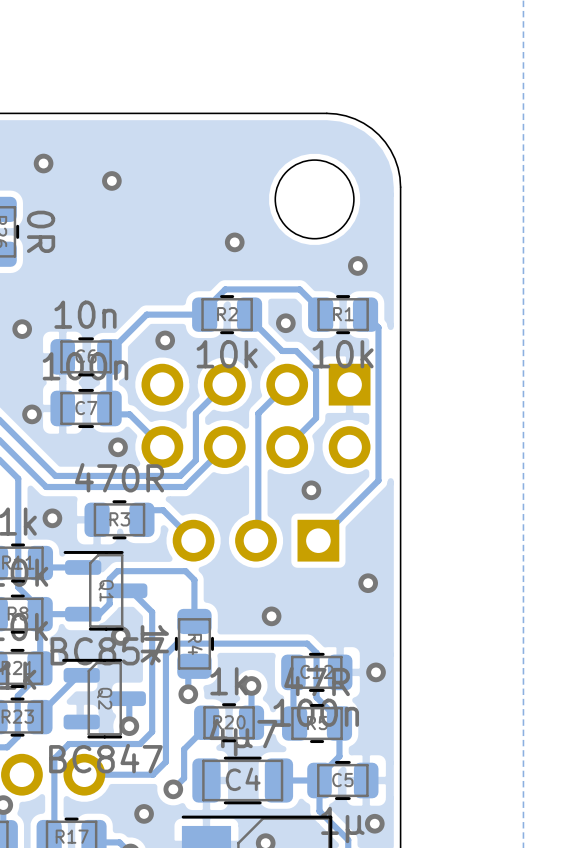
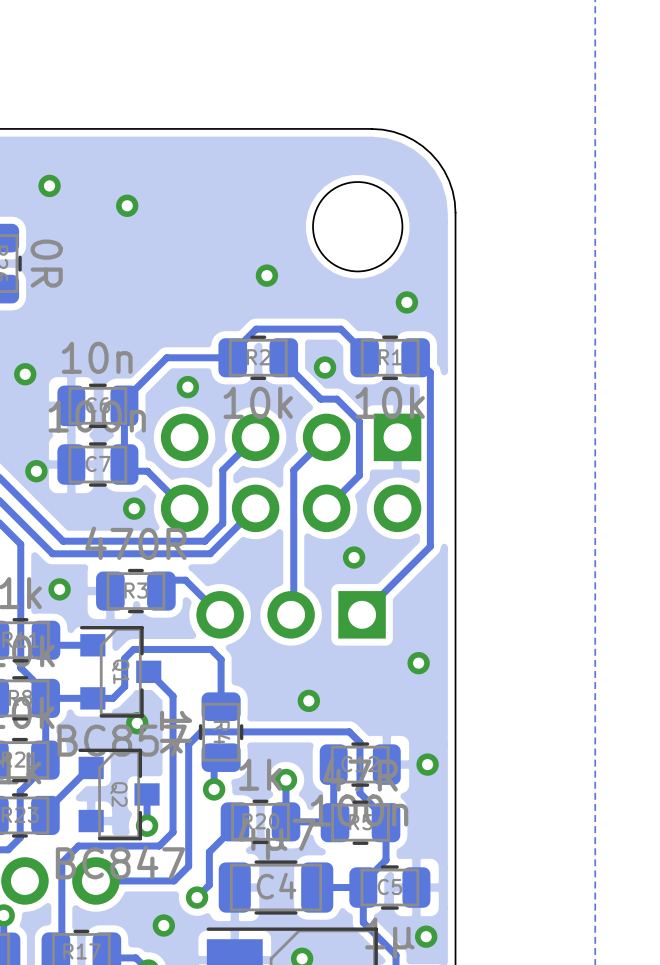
Q1 footprint: [63, 551, 148, 631] -> [80, 626, 162, 718]
Q2 footprint: [62, 658, 146, 739] -> [78, 748, 160, 841]

